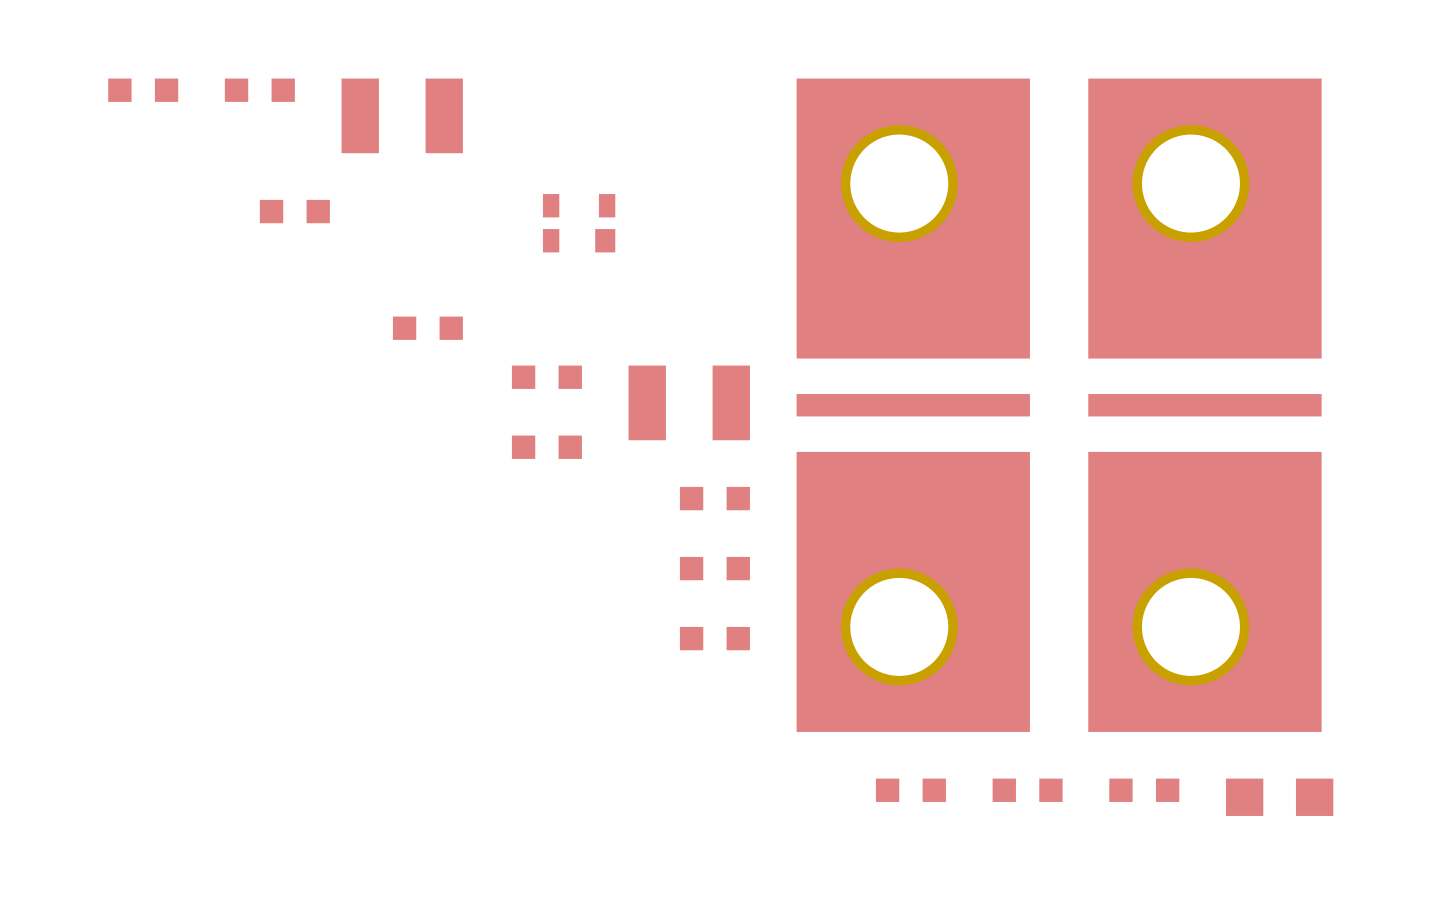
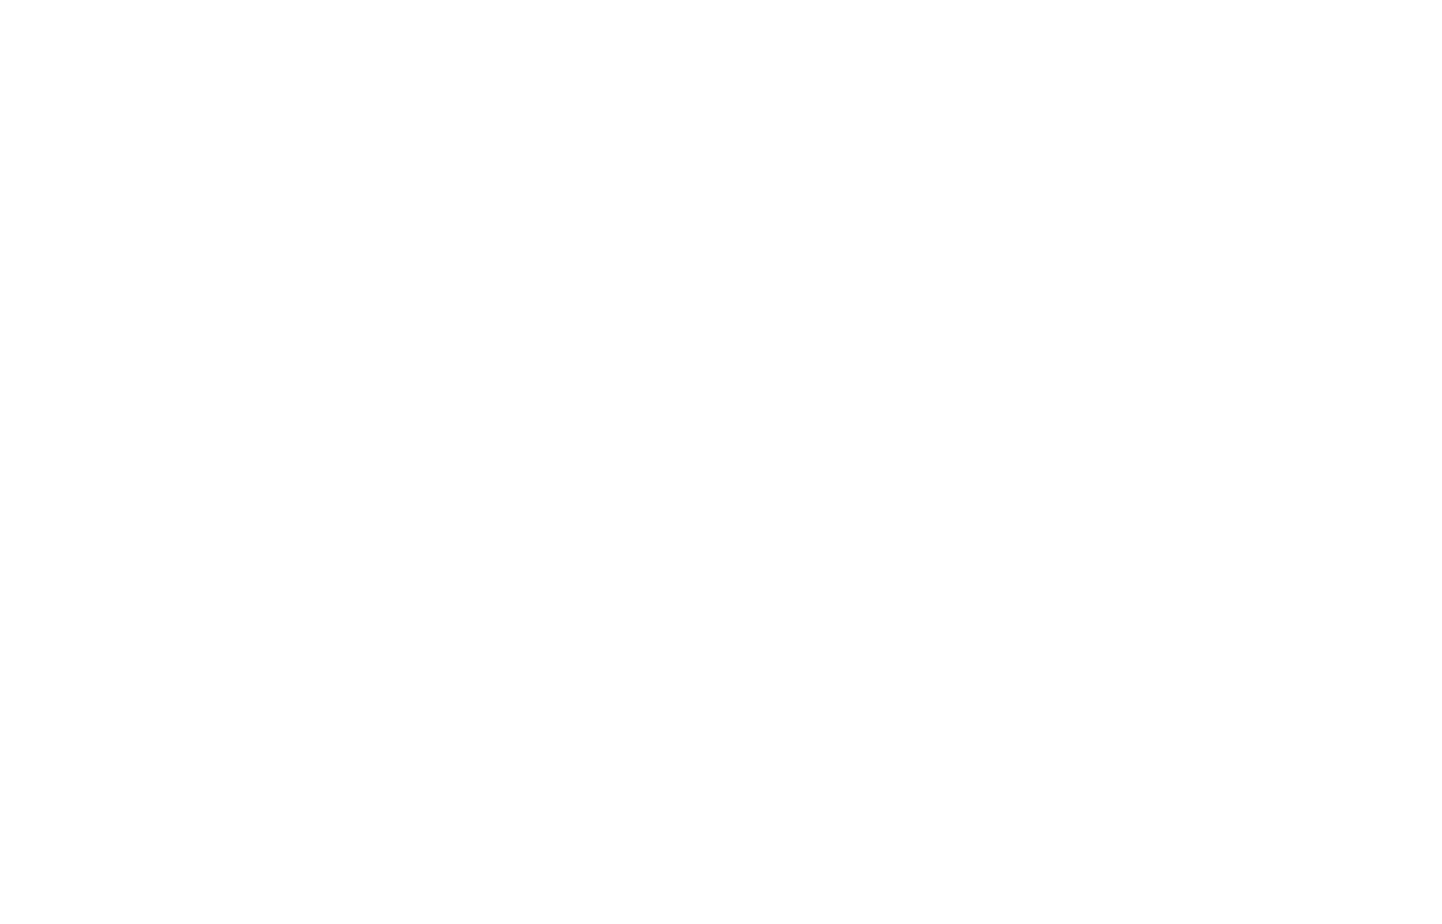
part: (143, 90) -> none
part: (259, 90) -> none
part: (402, 115) -> none
part: (294, 211) -> none
part: (579, 223) -> none
part: (427, 328) -> none
part: (546, 377) -> none
part: (689, 402) -> none
part: (913, 405) -> none
part: (1204, 405) -> none
part: (546, 447) -> none
part: (714, 498) -> none
part: (714, 568) -> none
part: (714, 638) -> none
part: (910, 790) -> none
part: (1027, 790) -> none
part: (1144, 790) -> none
part: (1279, 797) -> none

